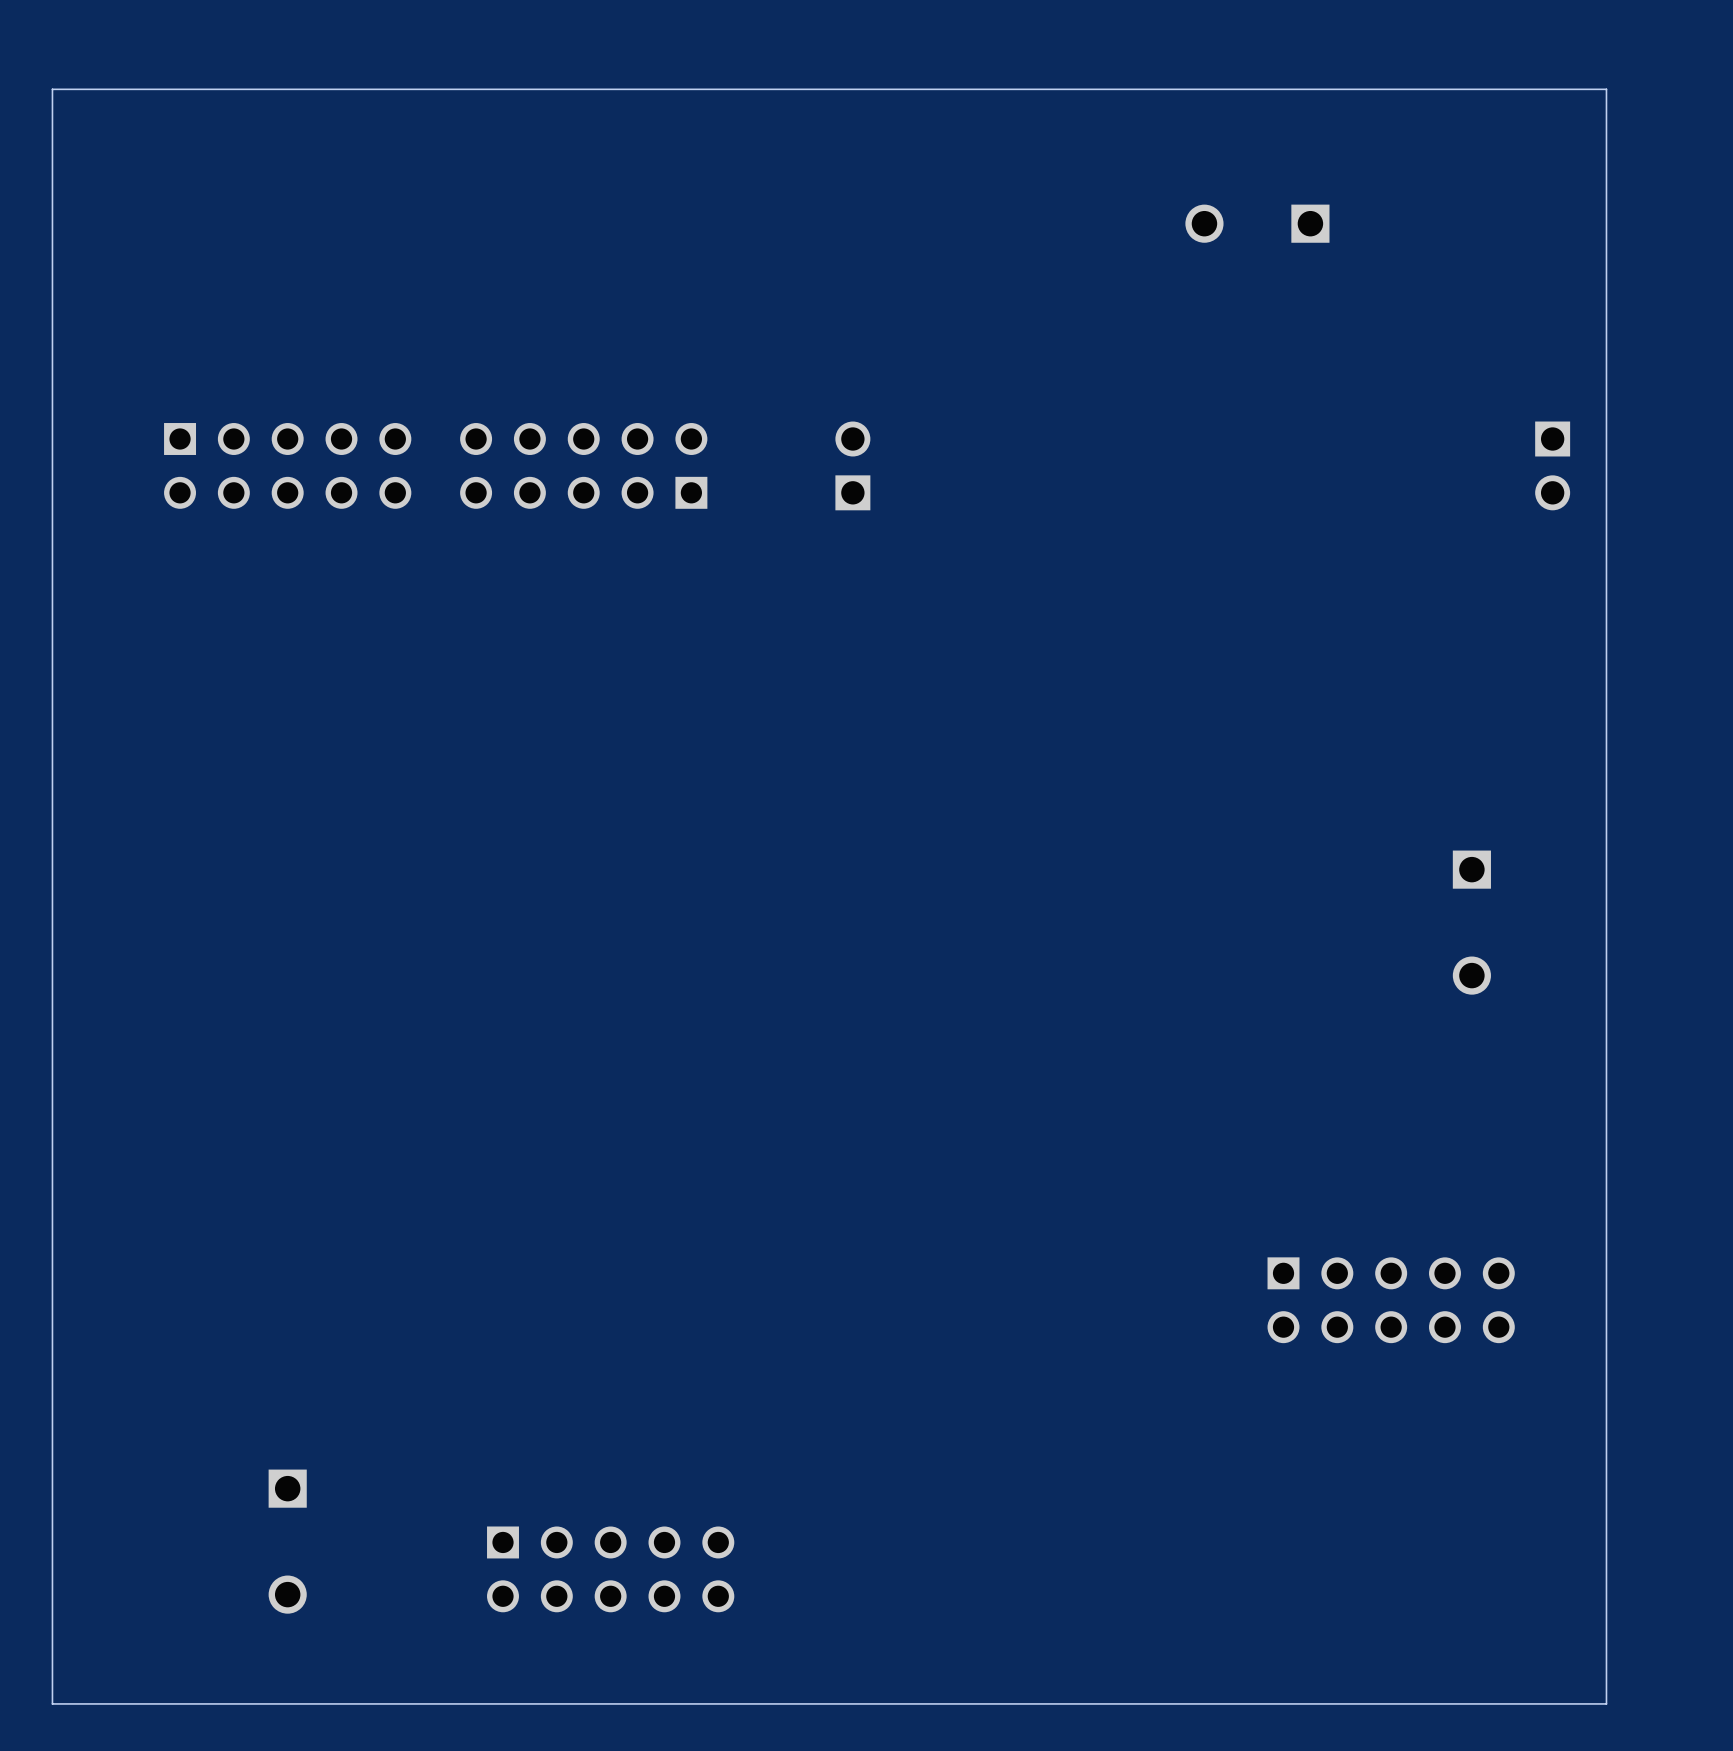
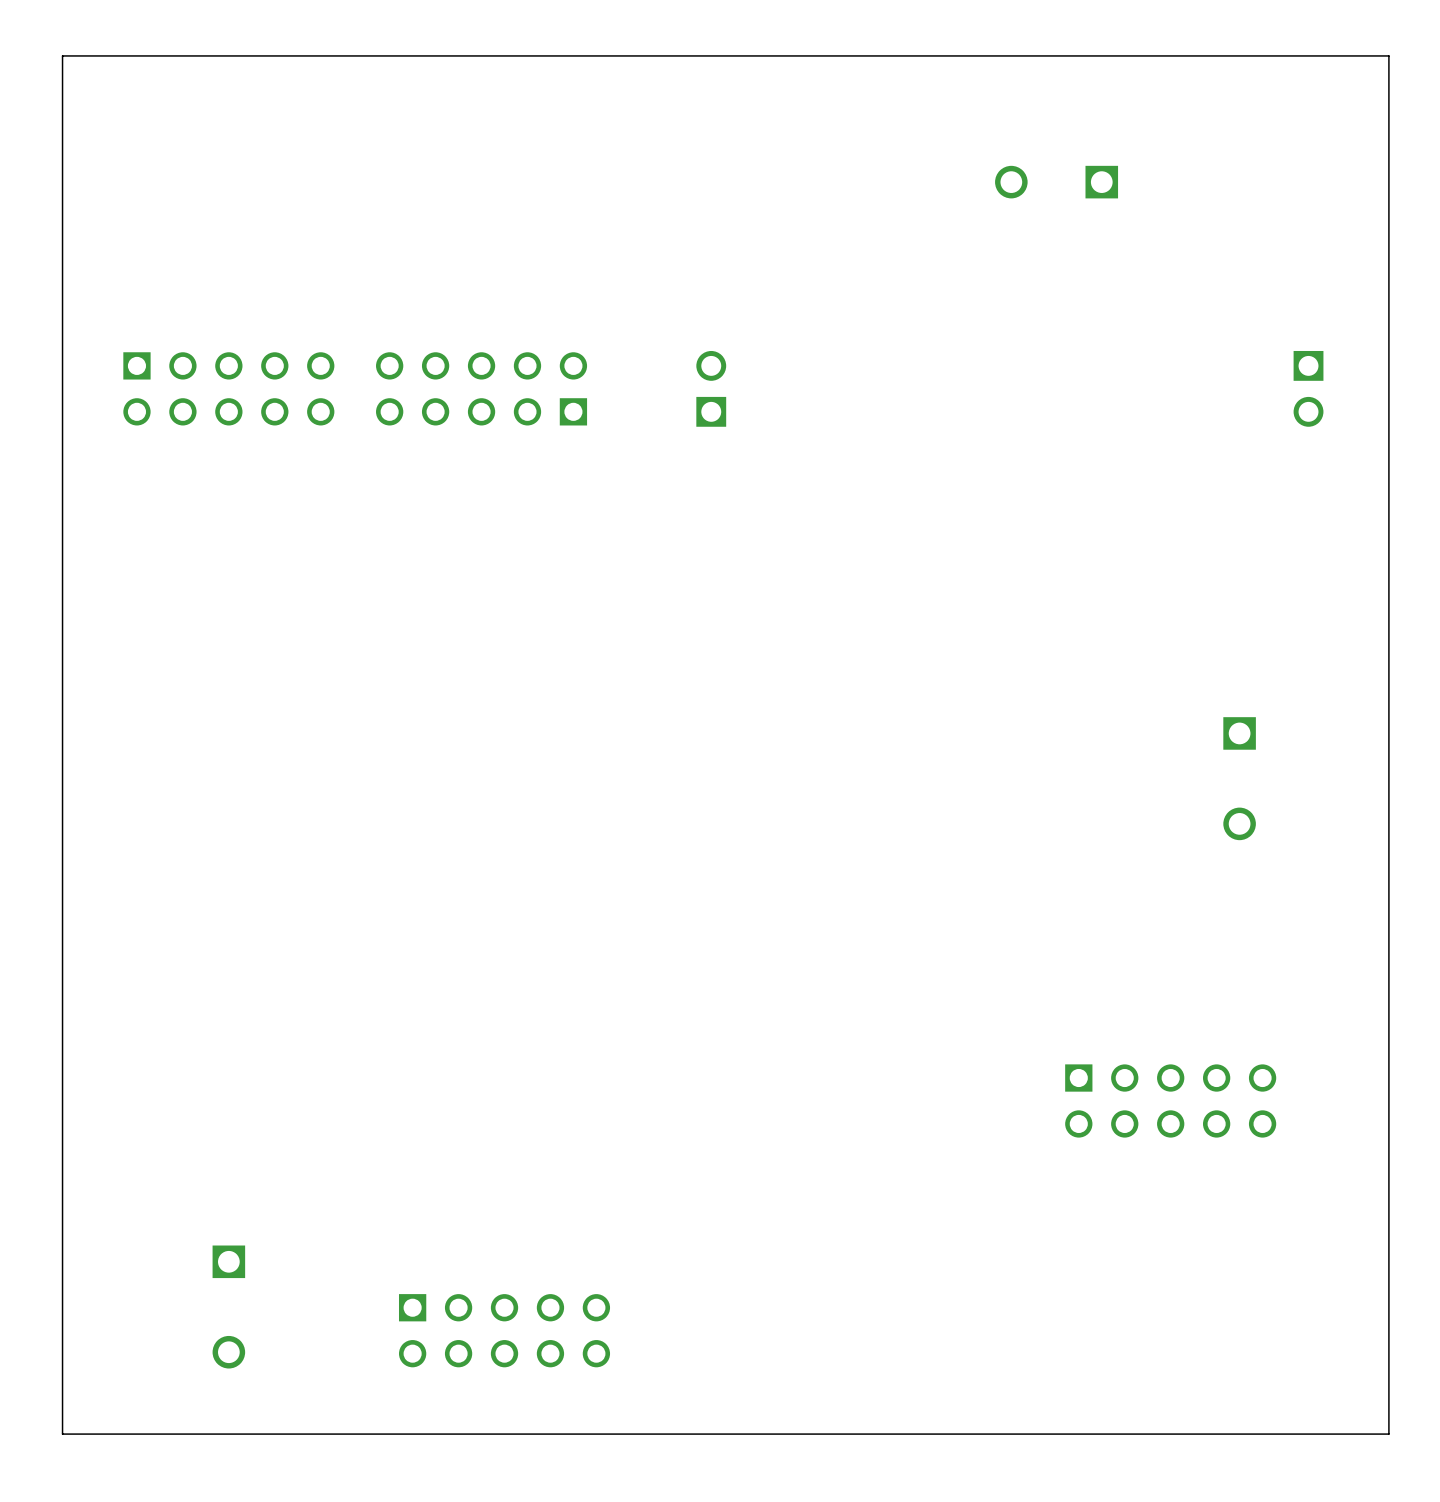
board edge: (1606, 89) (52, 89) (52, 1703) (1606, 1703) (1606, 89) -> (1388, 55) (62, 55) (62, 1434) (1388, 1434) (1388, 55)

